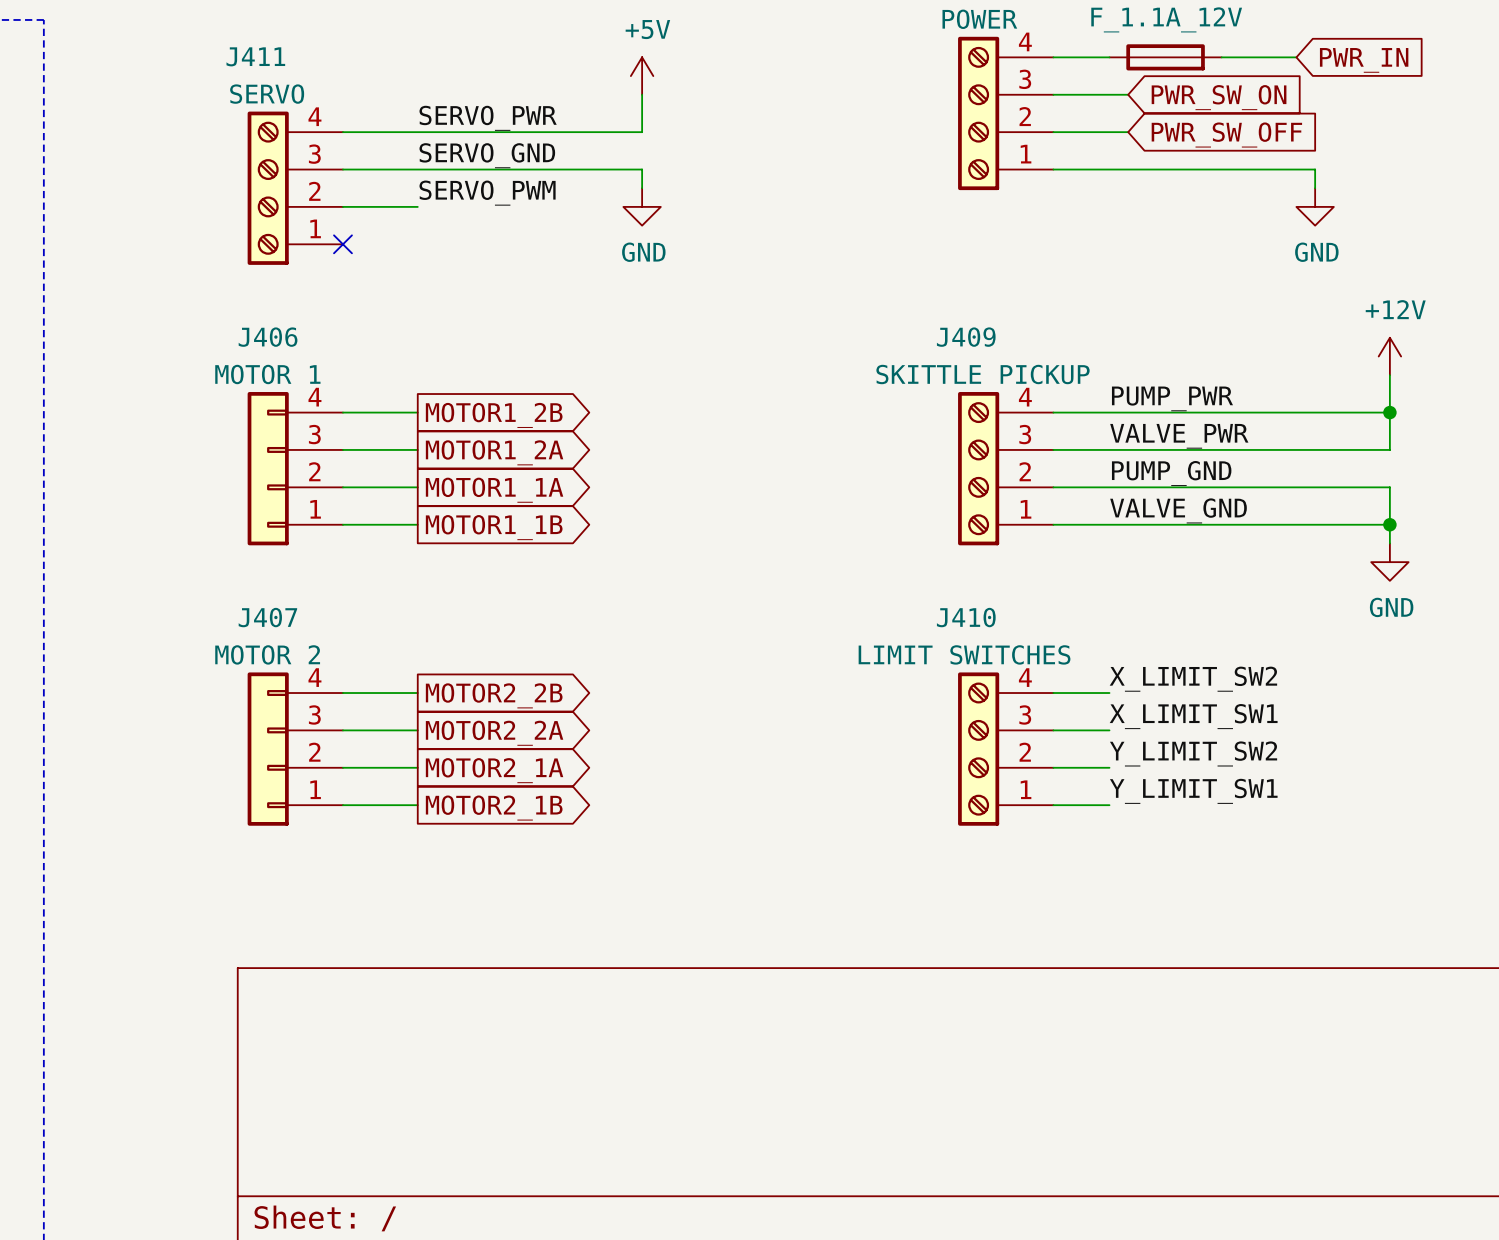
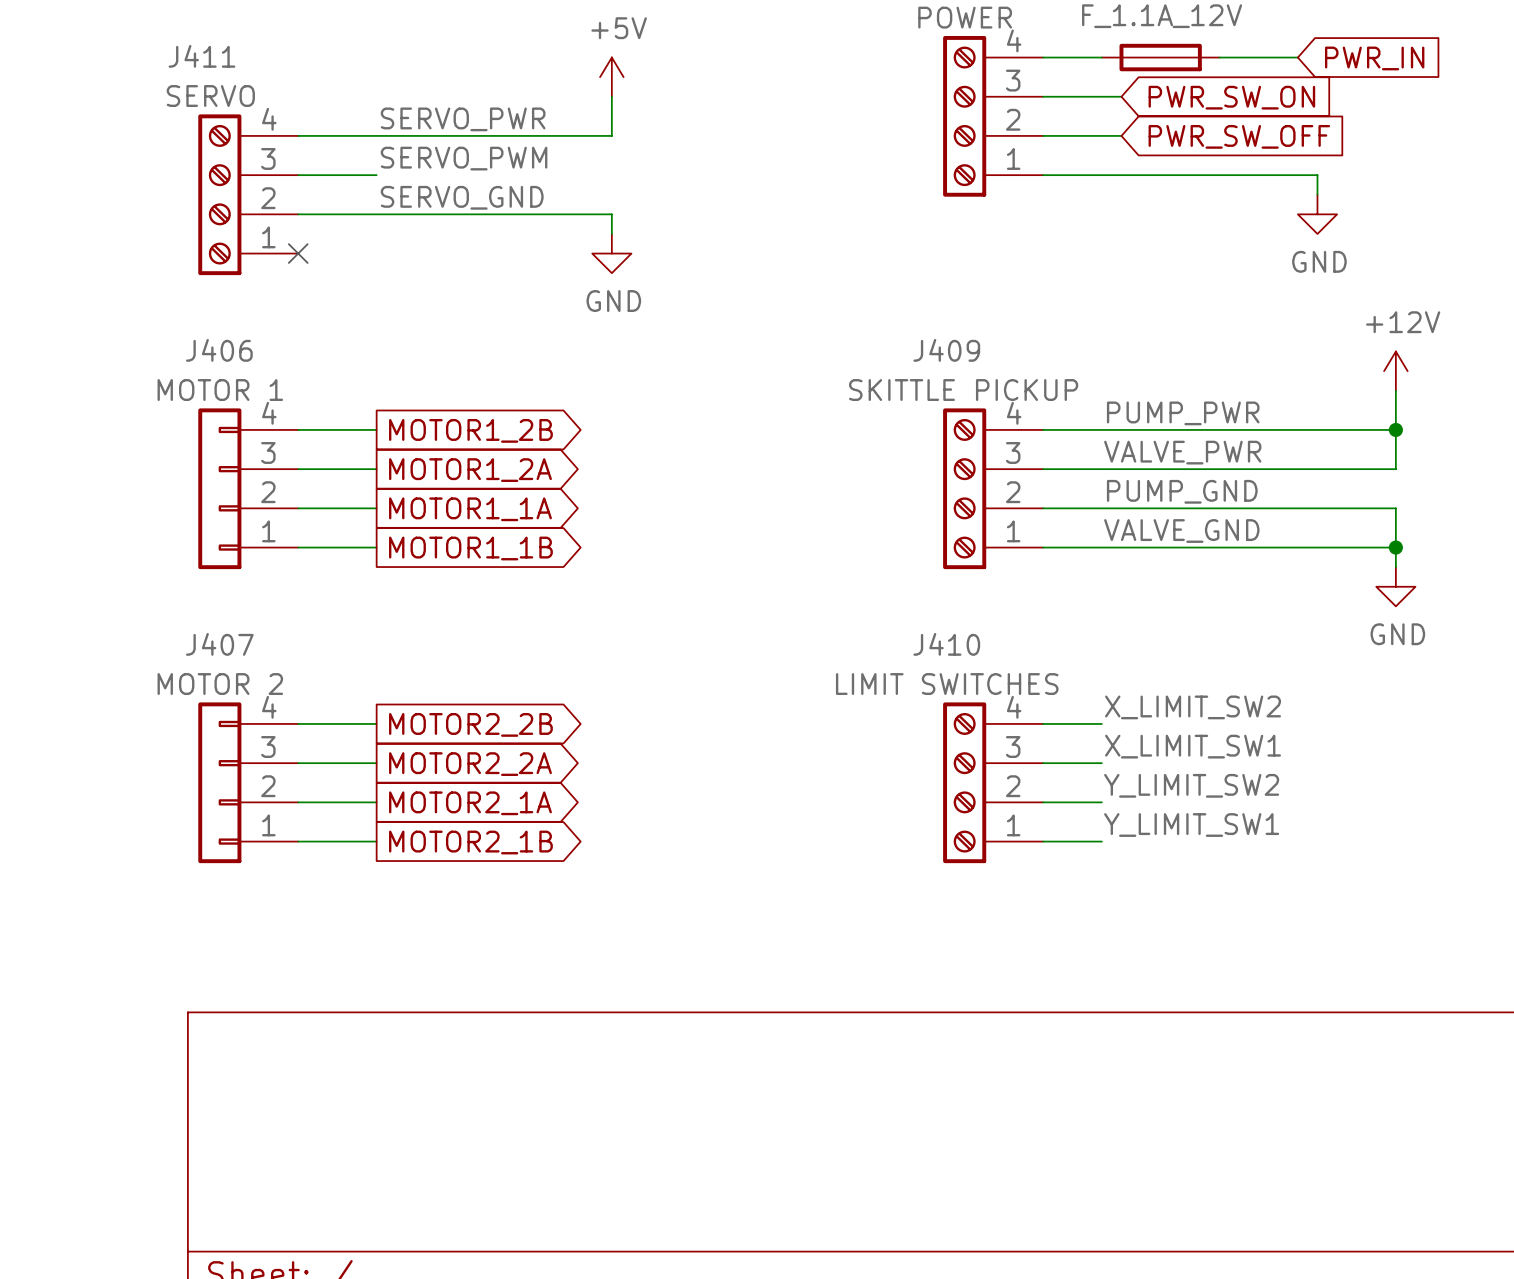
label: SERVO_GND (487, 155) -> SERVO_PWM (464, 158)
wire: (417, 169) (642, 169) (642, 188) -> (376, 214) (611, 214) (611, 233)
label: SERVO_PWM (487, 193) -> SERVO_GND (462, 197)
power symbol position: GND (642, 206) -> GND (611, 253)

